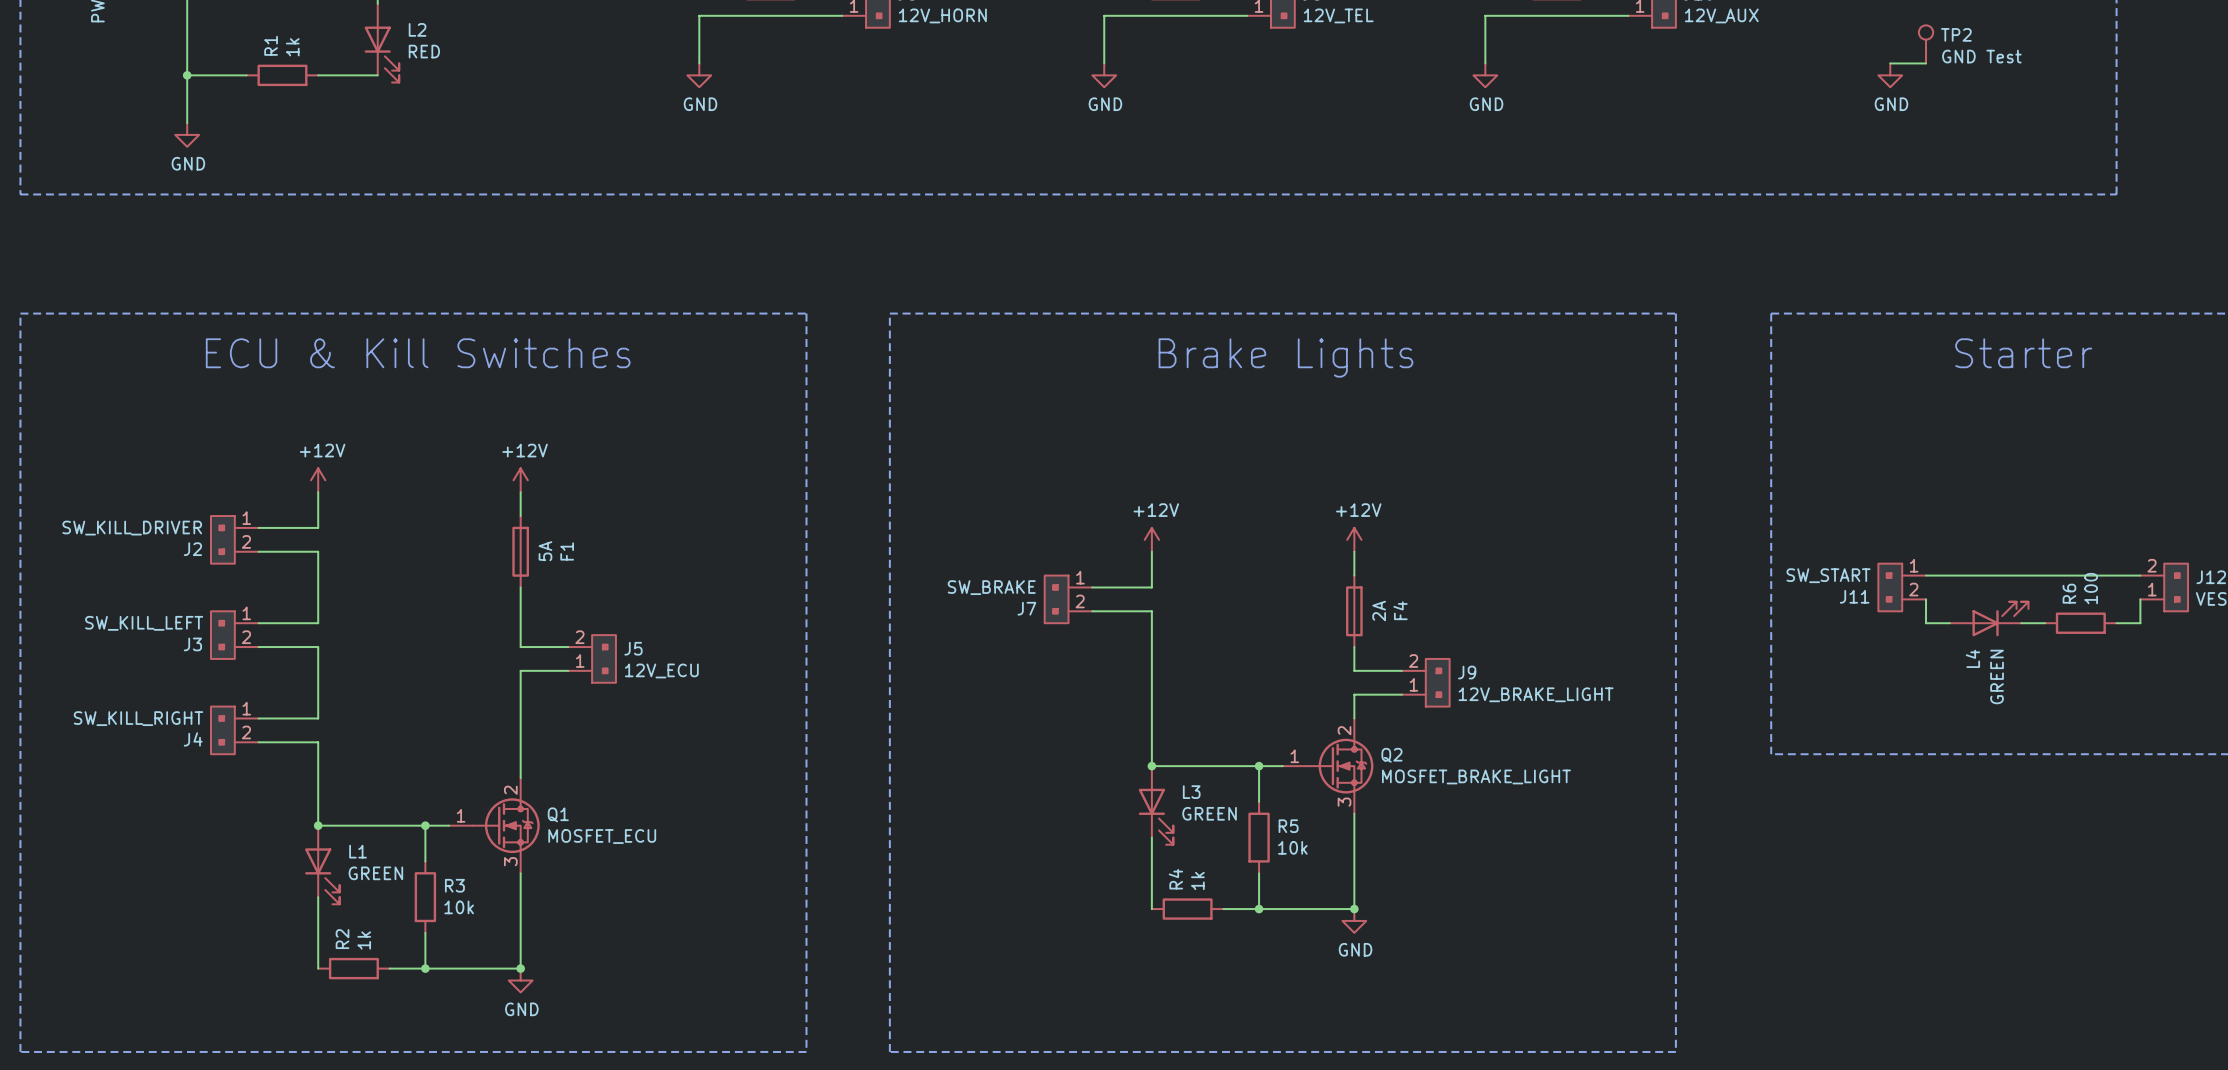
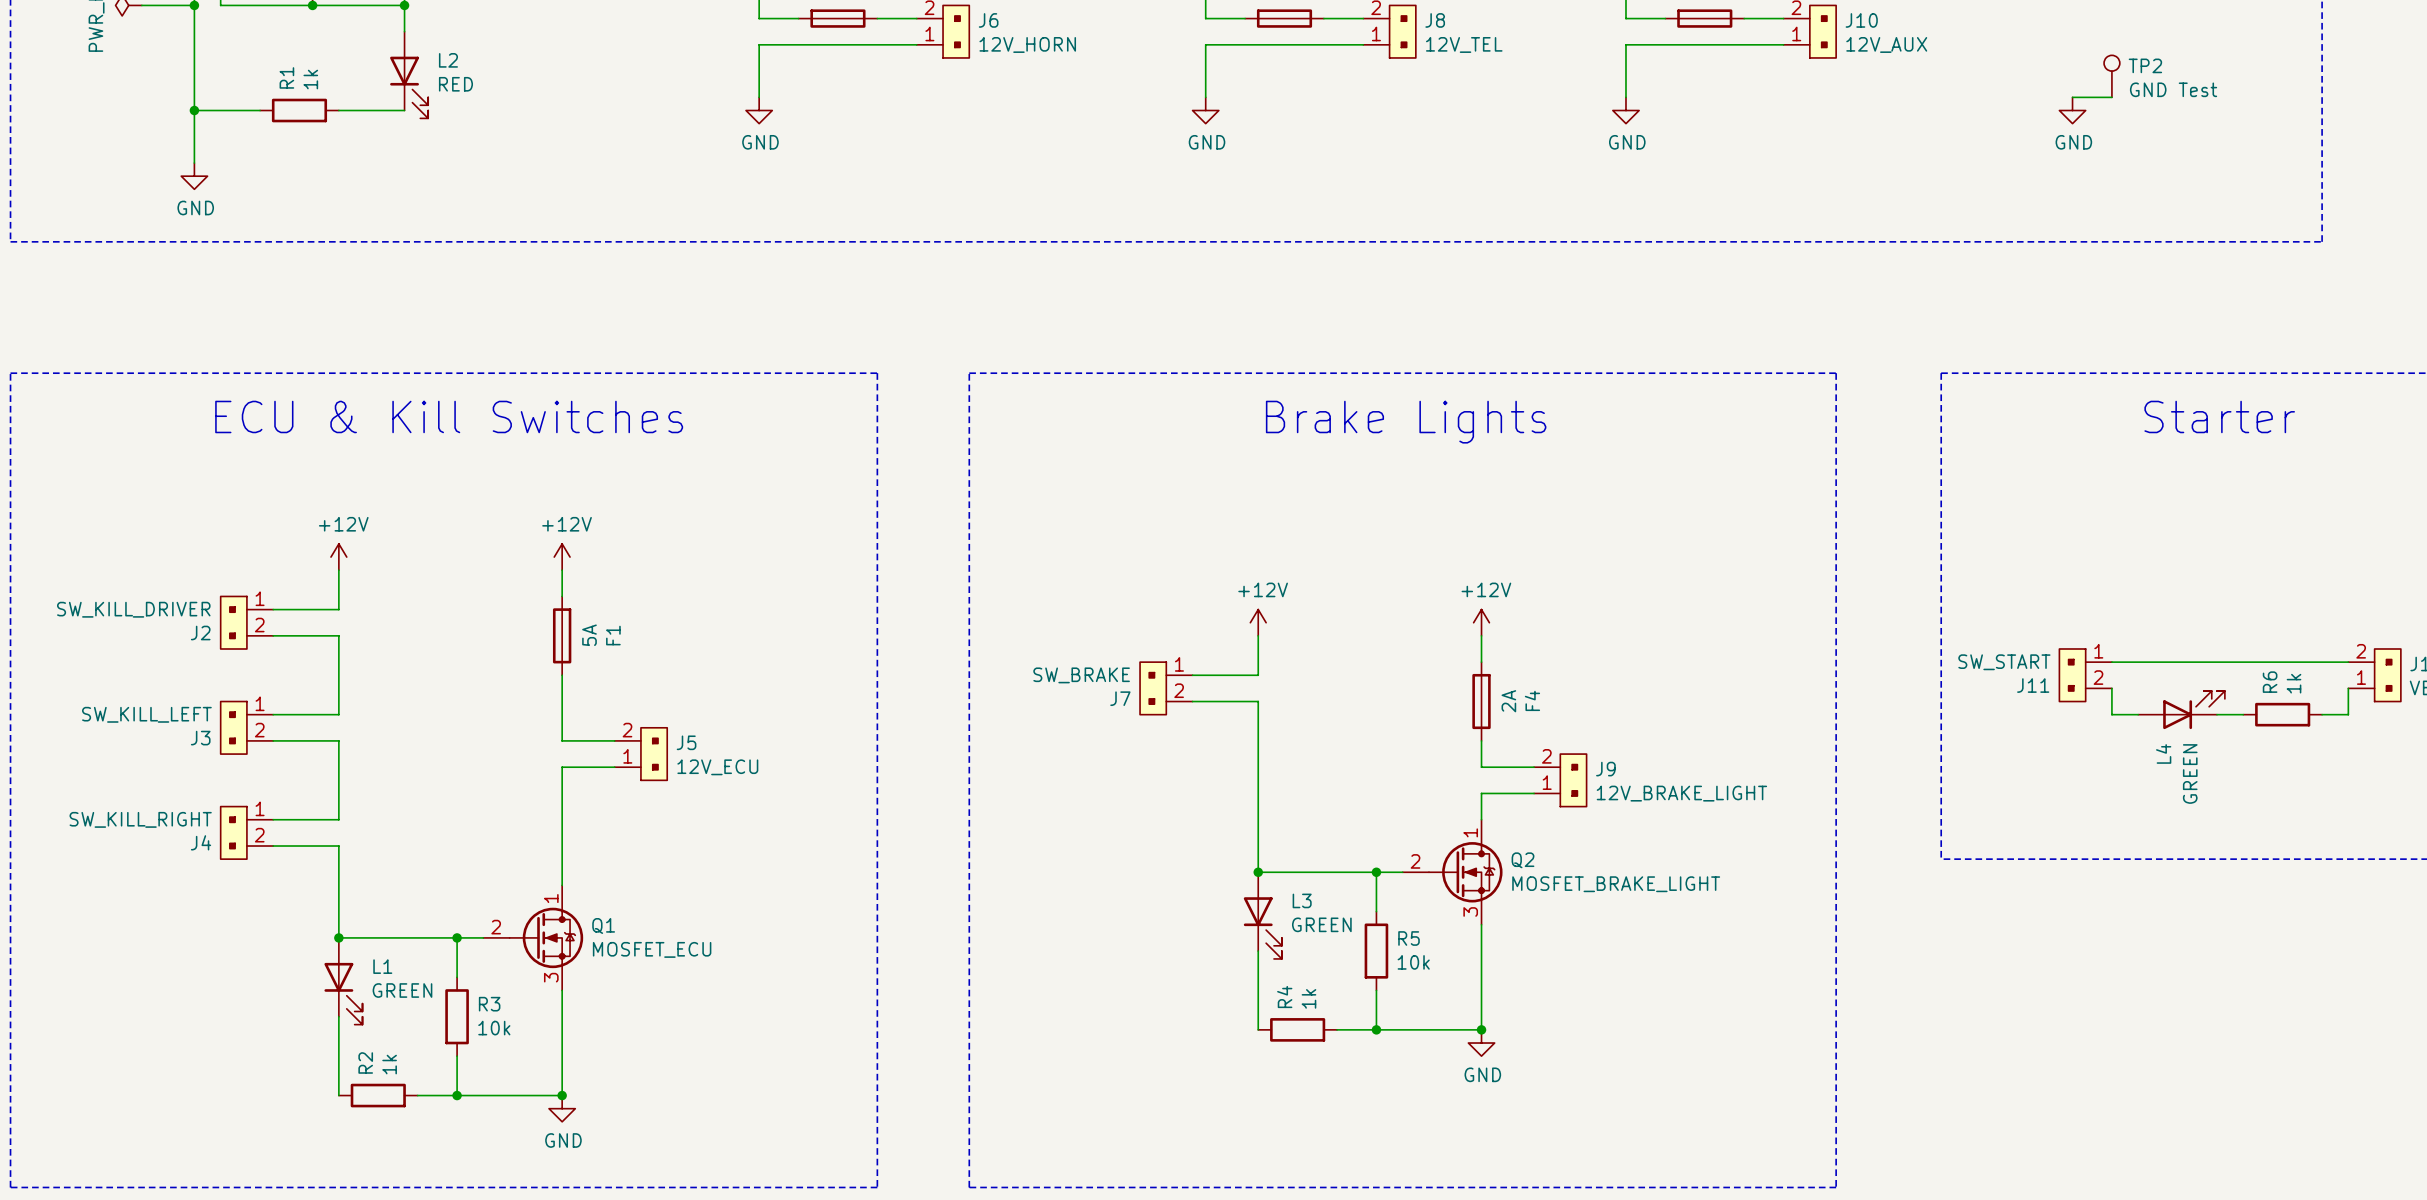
R6 value: 100 (2091, 588) -> 1k (2294, 683)
Q2 pin number: 2 (1344, 730) -> 1 (1470, 832)
Q2 pin number: 1 (1294, 756) -> 2 (1415, 861)
Q1 pin number: 2 (510, 790) -> 1 (551, 898)
Q1 pin number: 1 (461, 815) -> 2 (496, 927)

